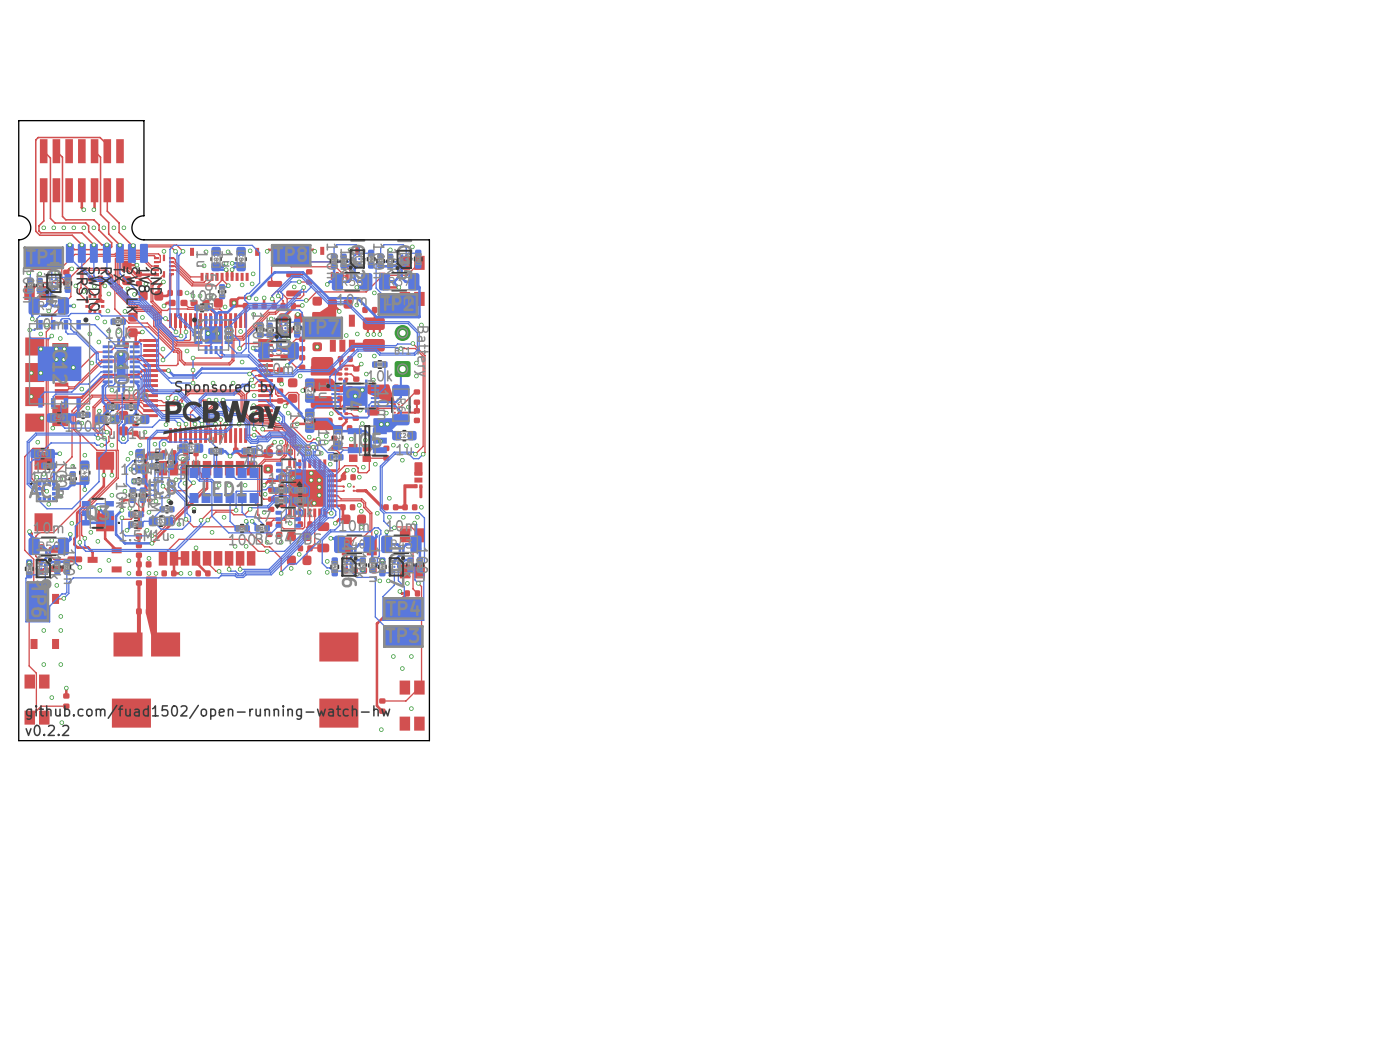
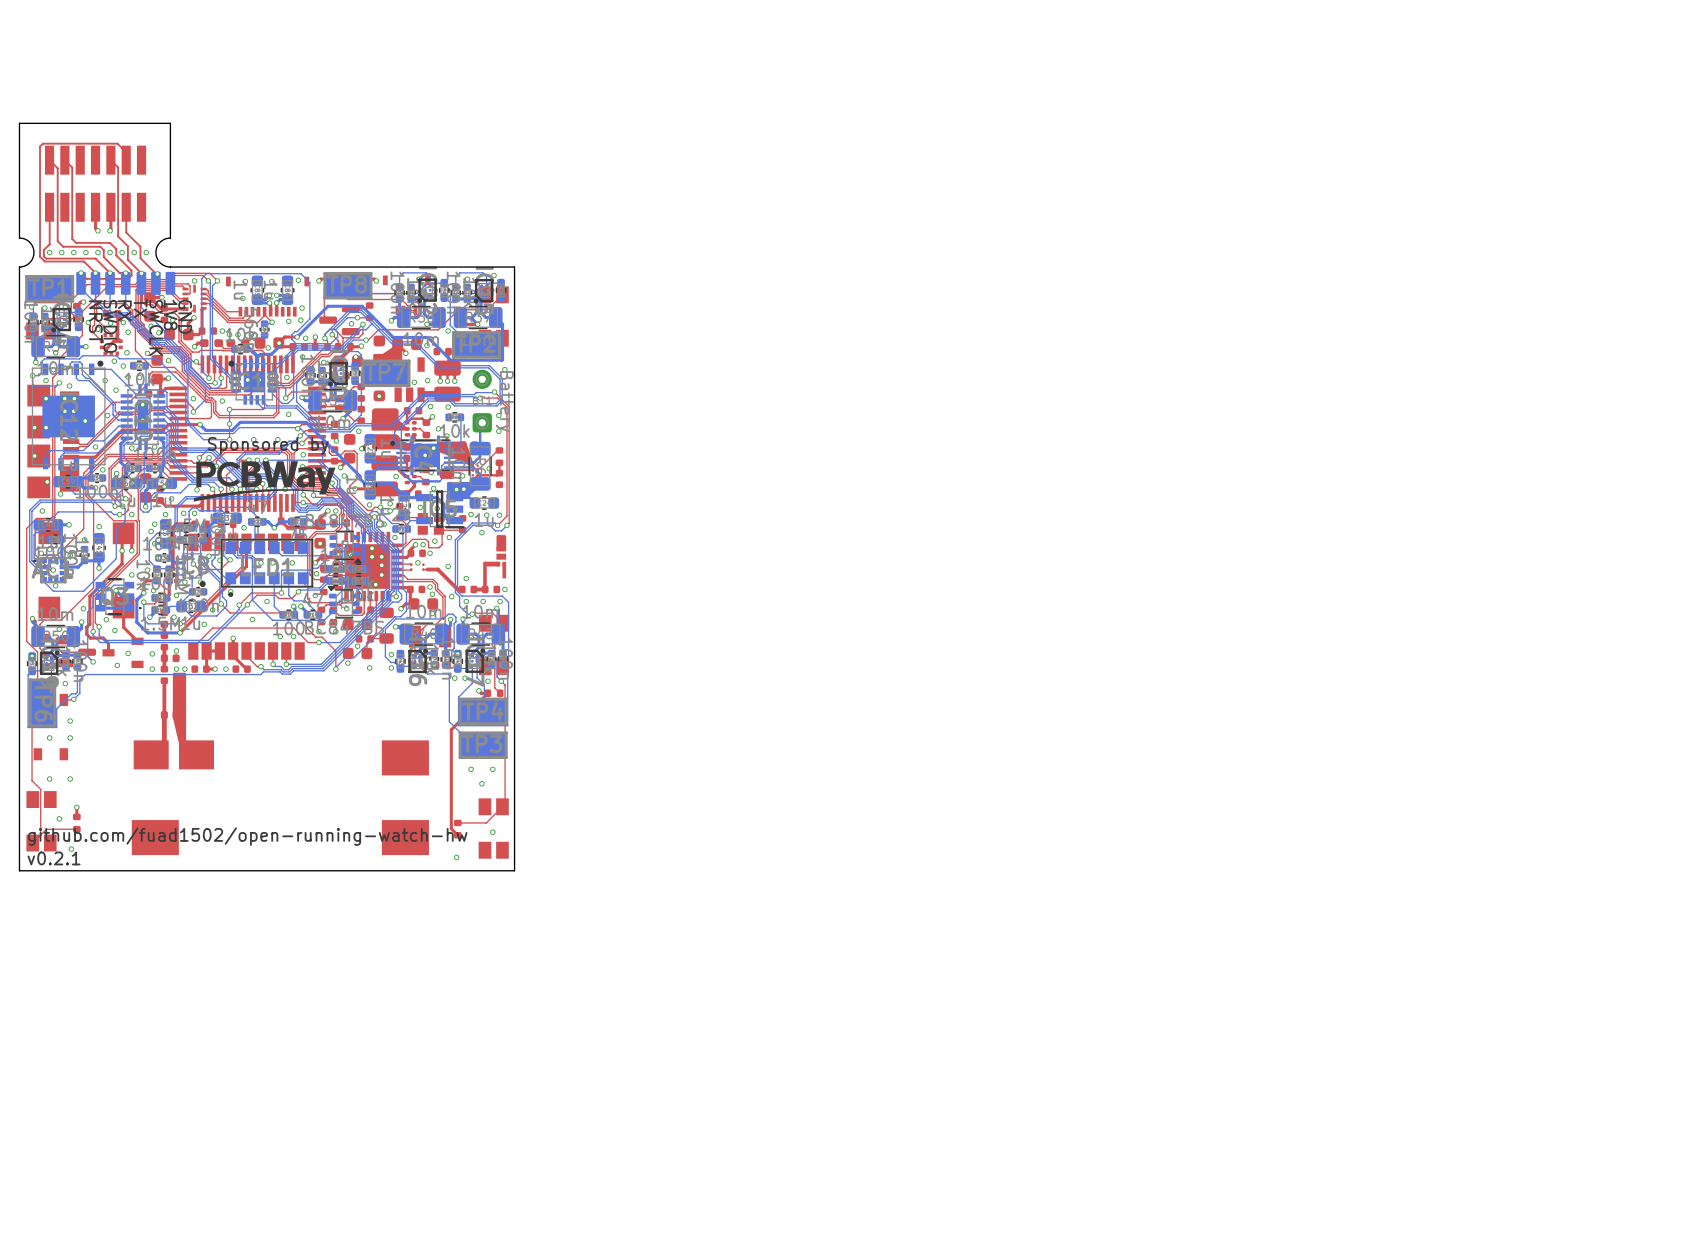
text: v0.2.2 (47, 730) -> v0.2.1 (54, 858)

